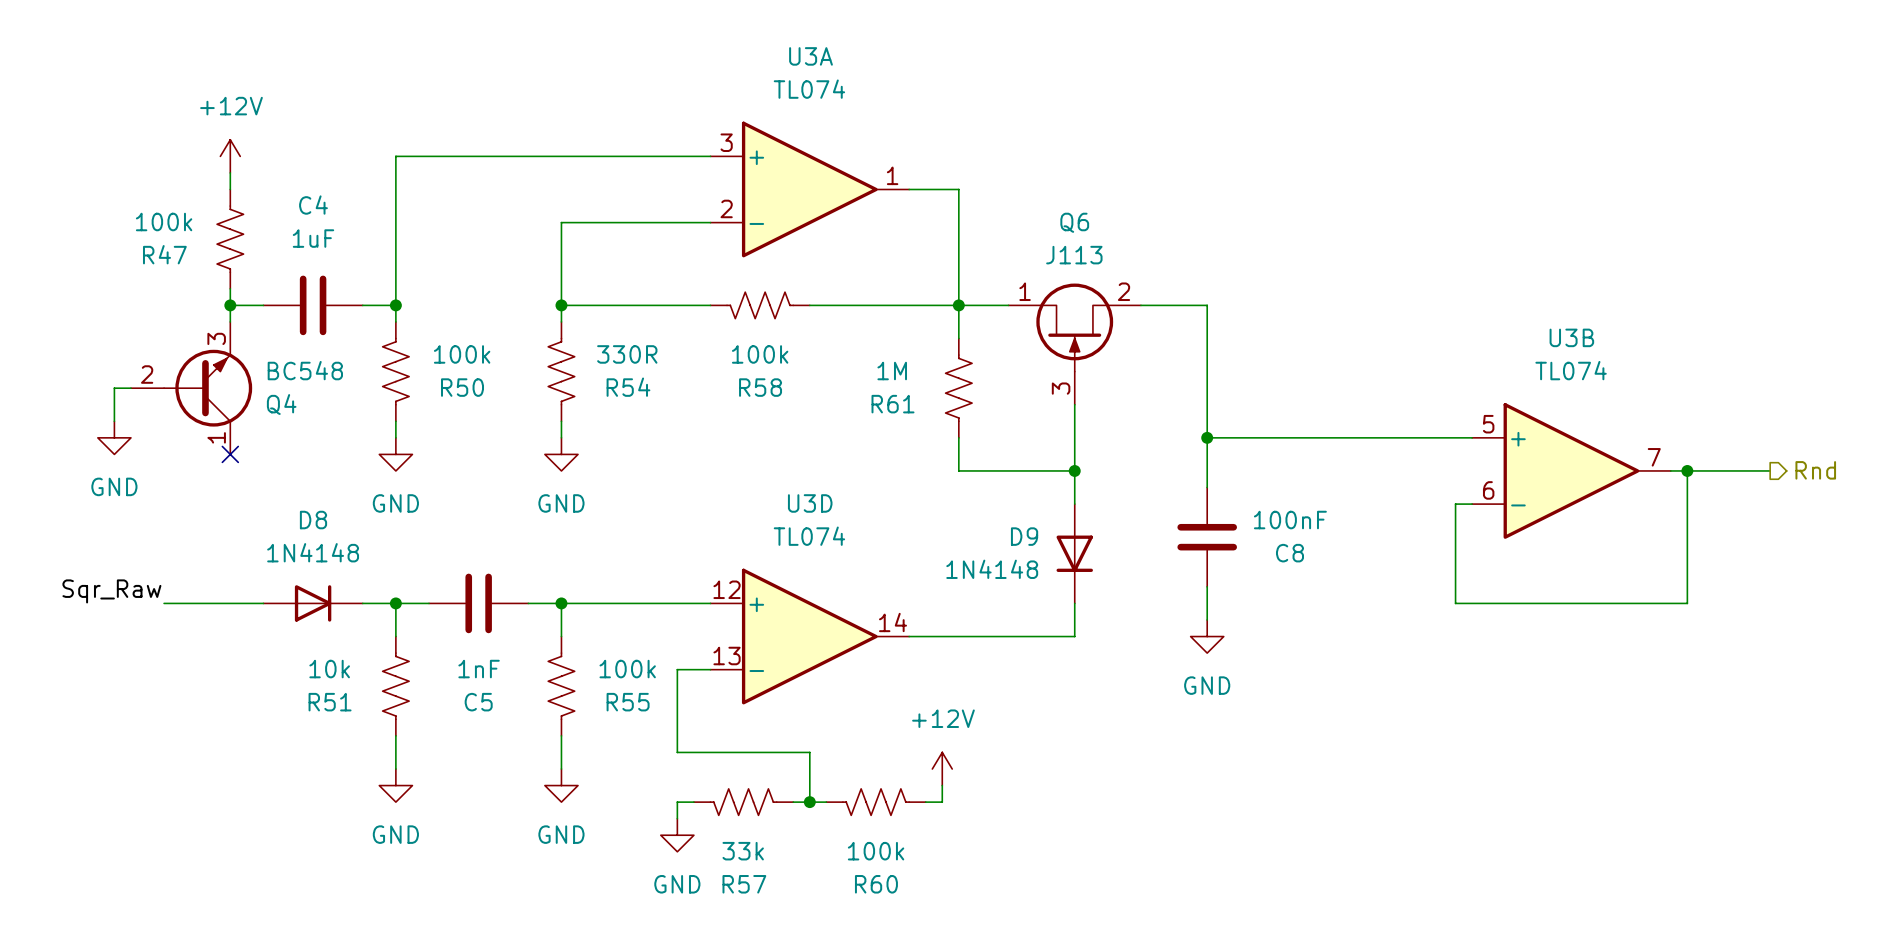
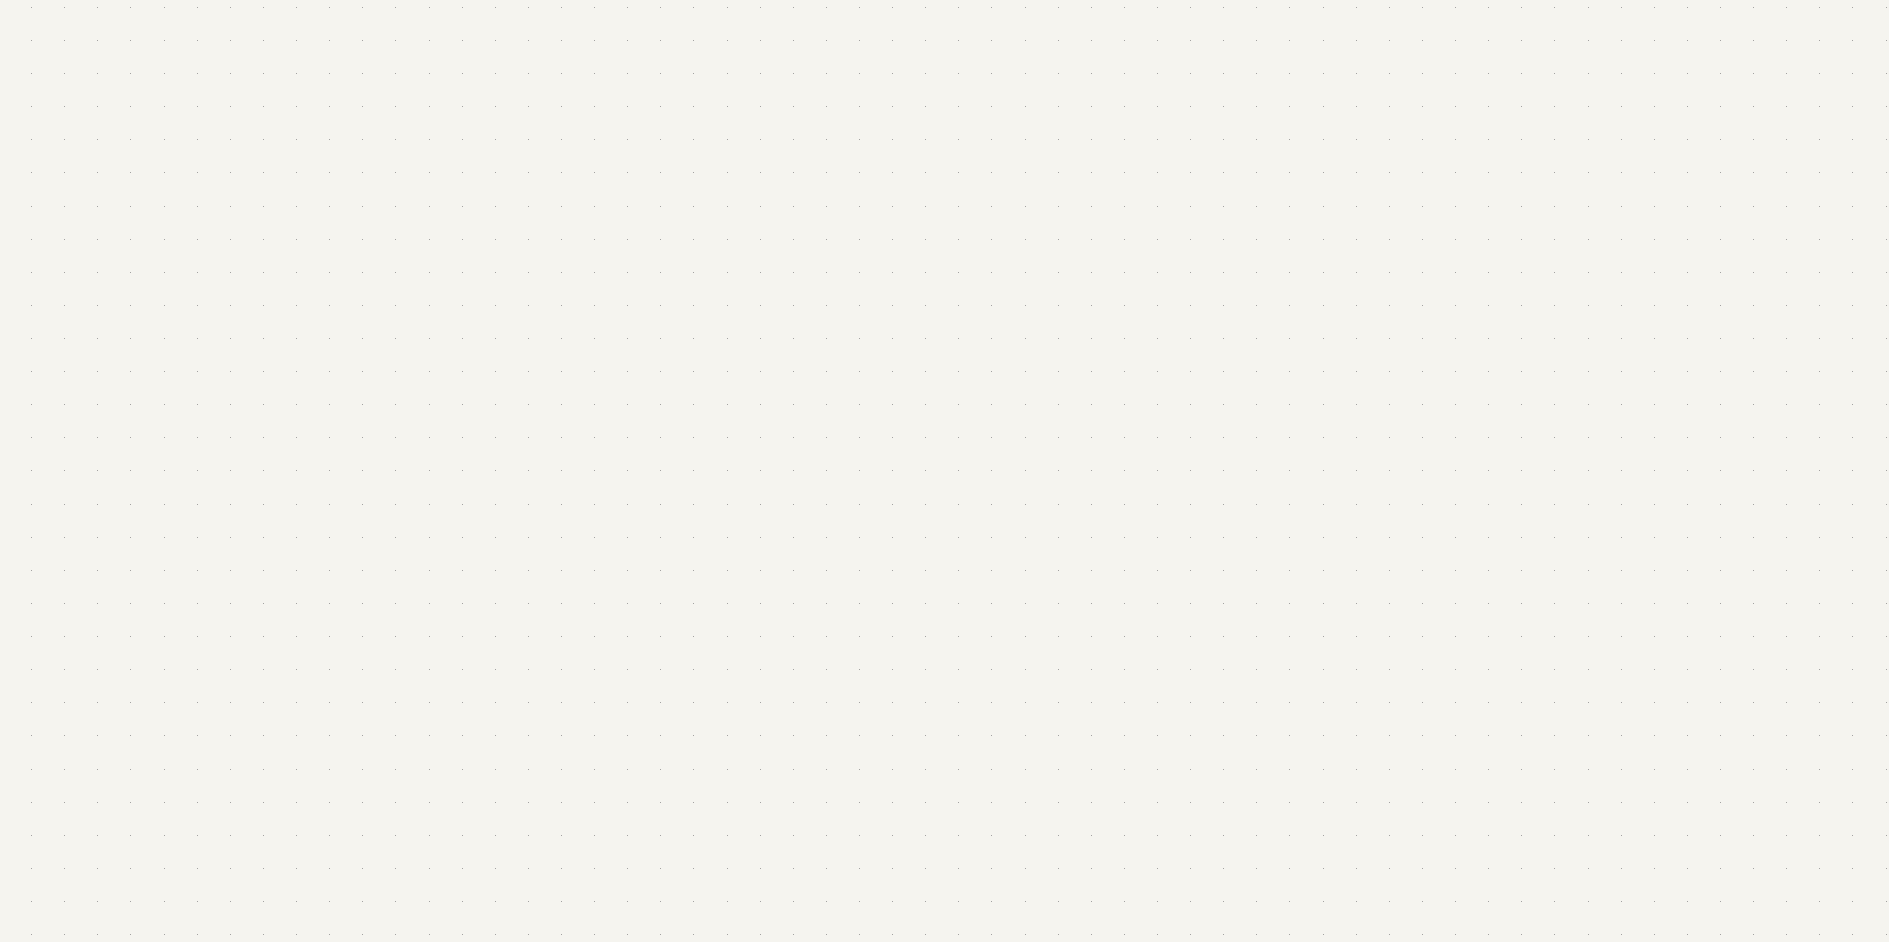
power symbol: +12V (230, 156) -> none
wire: (710, 156) (395, 156) (395, 321) -> none
wire: (230, 172) (230, 189) -> none
U3A: TL074 (809, 189) -> none
wire: (909, 189) (958, 189) (958, 338) -> none
wire: (710, 222) (561, 222) (561, 321) -> none
R47: 100k (230, 239) -> none
wire: (230, 288) (230, 321) -> none
wire: (230, 305) (263, 305) -> none
junction: (230, 305) -> none
C4: 1uF (313, 305) -> none
wire: (362, 305) (395, 305) -> none
junction: (395, 305) -> none
wire: (561, 305) (710, 305) -> none
junction: (561, 305) -> none
R58: 100k (760, 305) -> none
wire: (809, 305) (1008, 305) -> none
junction: (958, 305) -> none
wire: (1140, 305) (1207, 305) (1207, 487) -> none
Q6: J113 (1074, 344) -> none
R50: 100k (395, 371) -> none
R54: 330R (561, 371) -> none
wire: (130, 388) (114, 388) (114, 421) -> none
Q4: BC548 (191, 388) -> none
R61: 1M (958, 388) -> none
wire: (1074, 404) (1074, 504) -> none
wire: (395, 421) (395, 437) -> none
wire: (561, 421) (561, 437) -> none
power symbol: GND (114, 437) -> none
wire: (958, 437) (958, 470) (1074, 470) -> none
wire: (1207, 437) (1472, 437) -> none
junction: (1207, 437) -> none
no-connect mark: (230, 454) -> none
power symbol: GND (395, 454) -> none
power symbol: GND (561, 454) -> none
junction: (1074, 470) -> none
U3B: TL074 (1571, 470) -> none
wire: (1670, 470) (1770, 470) -> none
wire: (1687, 470) (1687, 603) (1455, 603) (1455, 504) (1472, 504) -> none
junction: (1687, 470) -> none
hierarchical label: Rnd (1815, 470) -> none
C8: 100nF (1207, 537) -> none
D9: 1N4148 (1074, 553) -> none
wire: (1207, 586) (1207, 619) -> none
label: Sqr_Raw (111, 591) -> none
wire: (164, 603) (263, 603) -> none
D8: 1N4148 (313, 603) -> none
wire: (362, 603) (429, 603) -> none
wire: (395, 603) (395, 636) -> none
junction: (395, 603) -> none
C5: 1nF (478, 603) -> none
wire: (528, 603) (710, 603) -> none
wire: (561, 603) (561, 636) -> none
junction: (561, 603) -> none
wire: (1074, 603) (1074, 636) (909, 636) -> none
U3D: TL074 (809, 636) -> none
power symbol: GND (1207, 636) -> none
wire: (710, 669) (677, 669) (677, 752) (809, 752) (809, 802) -> none
R51: 10k (395, 686) -> none
R55: 100k (561, 686) -> none
wire: (395, 735) (395, 769) -> none
wire: (561, 735) (561, 769) -> none
power symbol: +12V (942, 769) -> none
power symbol: GND (395, 785) -> none
power symbol: GND (561, 785) -> none
wire: (942, 785) (942, 802) (925, 802) -> none
wire: (693, 802) (677, 802) (677, 818) -> none
R57: 33k (743, 802) -> none
wire: (793, 802) (826, 802) -> none
junction: (809, 802) -> none
R60: 100k (876, 802) -> none
power symbol: GND (677, 835) -> none

